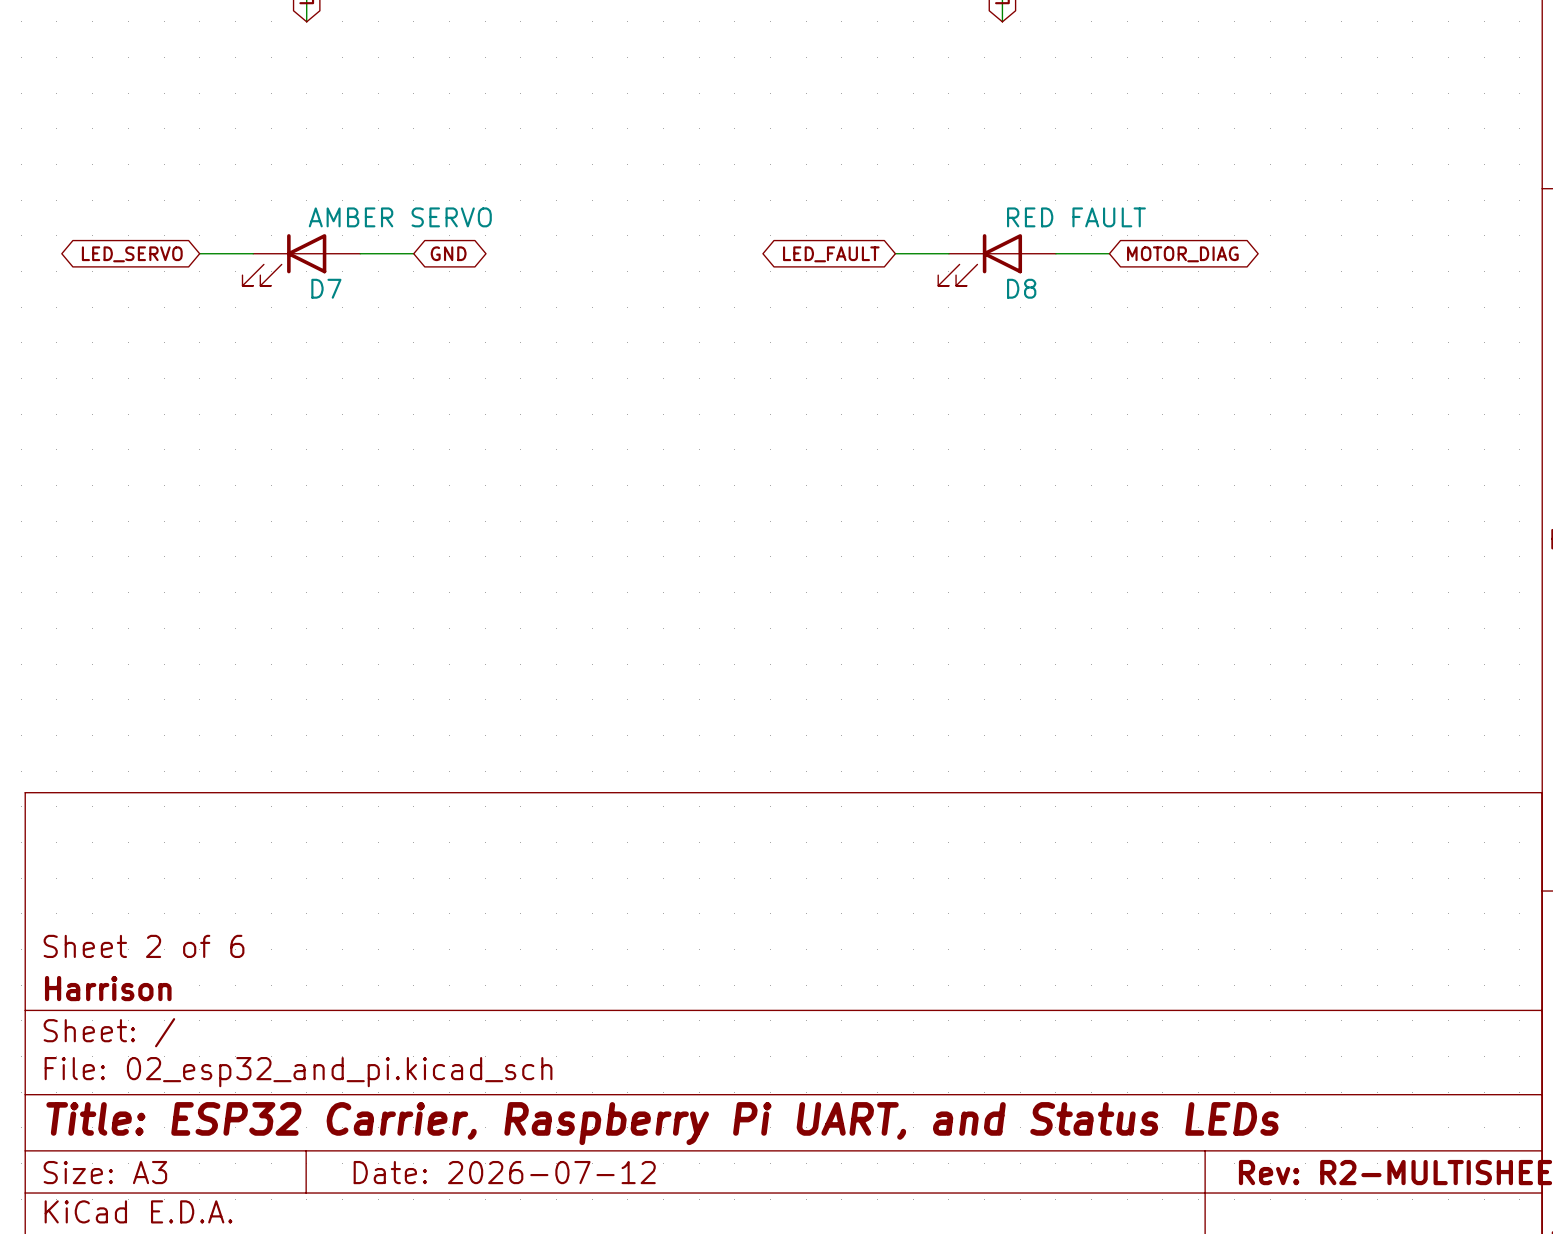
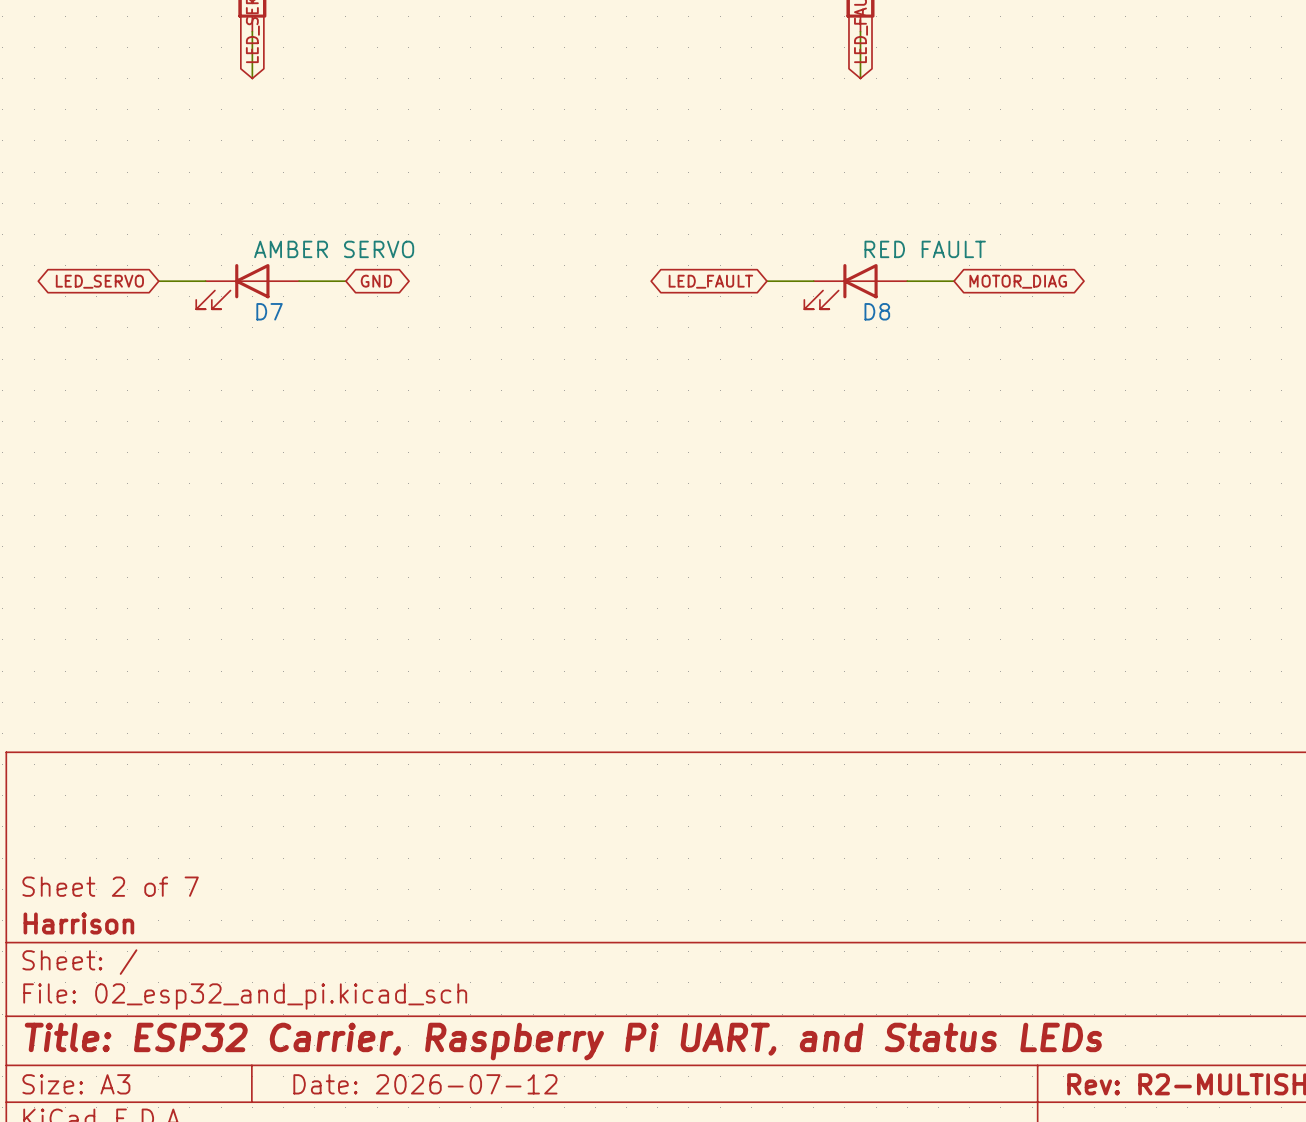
title block: Sheet 2 of 6 (144, 946) -> Sheet 2 of 7 (110, 886)

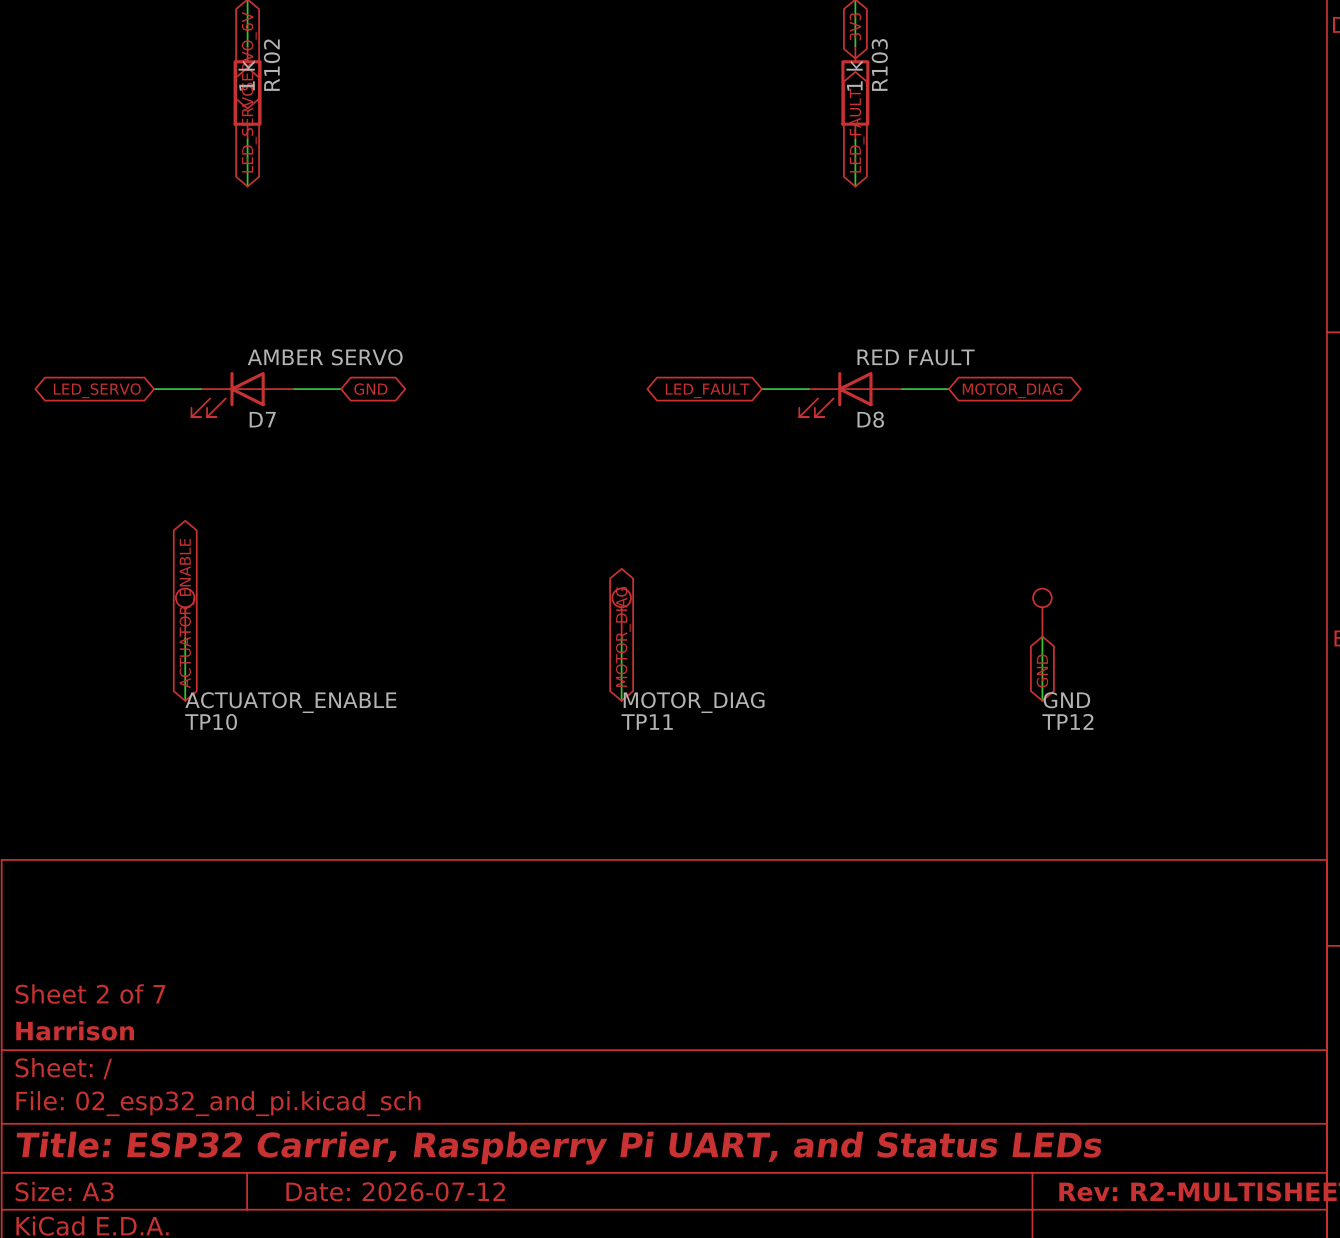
global label: none -> ACTUATOR_ENABLE (186, 613)
TP10: none -> ACTUATOR_ENABLE (185, 613)
TP11: none -> MOTOR_DIAG (621, 613)
TP12: none -> GND (1042, 613)
global label: none -> MOTOR_DIAG (623, 636)
wire: none -> (185, 638) (185, 700)
wire: none -> (621, 638) (621, 700)
wire: none -> (1042, 638) (1042, 700)
global label: none -> GND (1042, 671)

